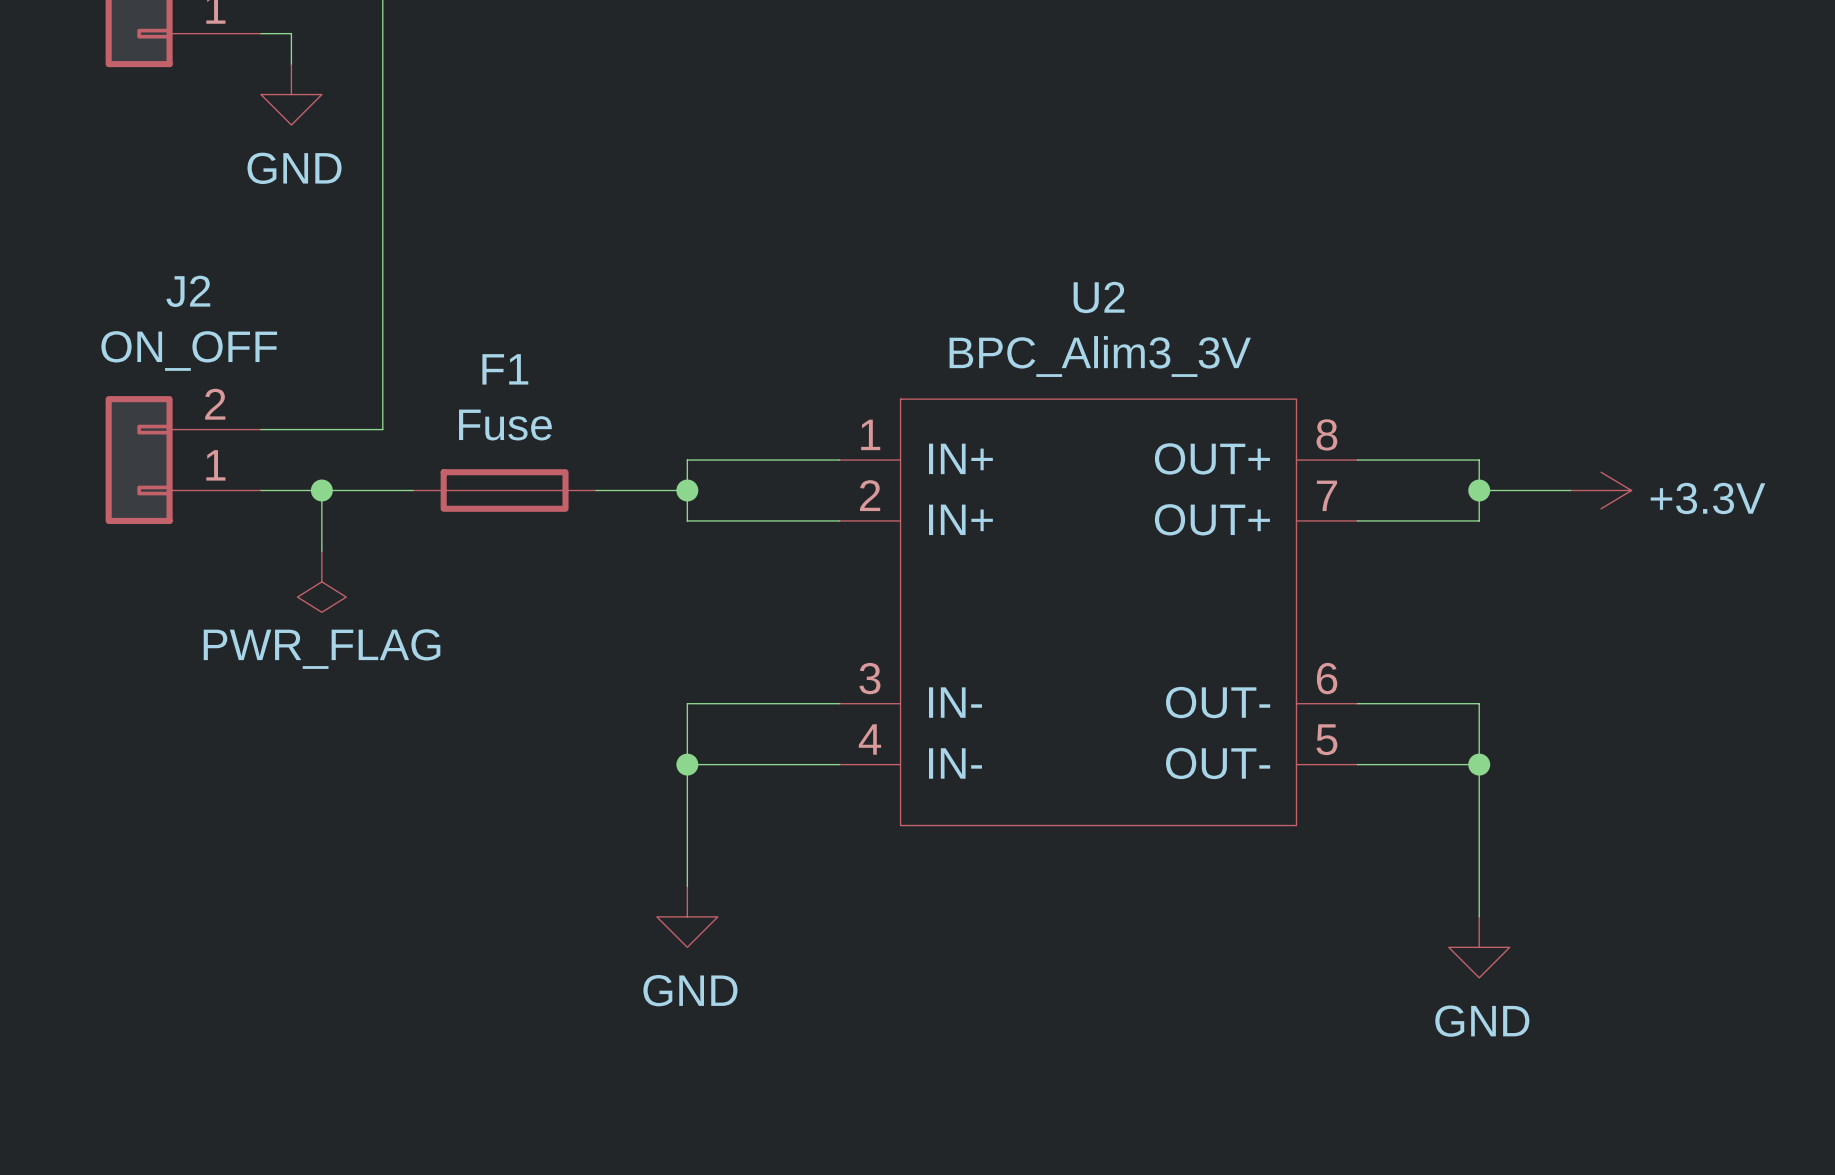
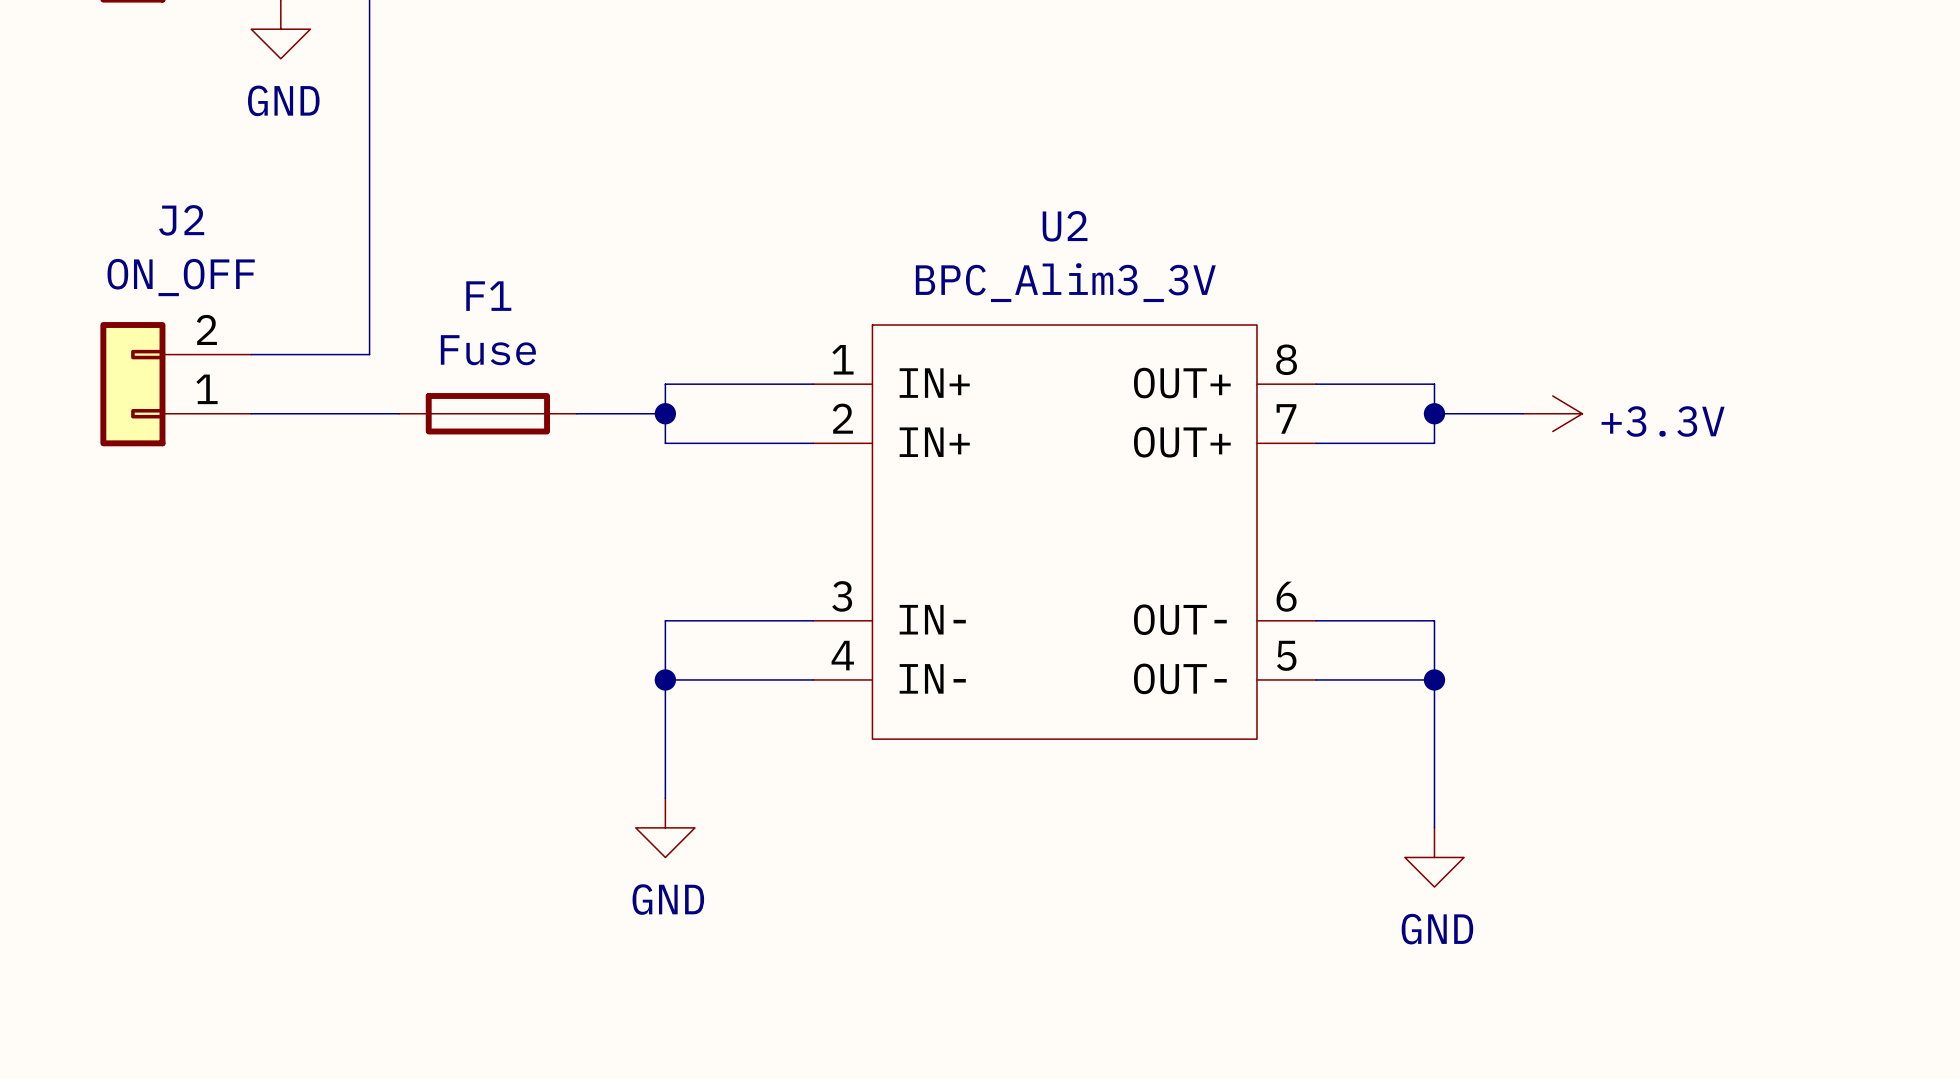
wire: (321, 490) (321, 551) -> none
junction: (321, 490) -> none
power symbol: PWR_FLAG (321, 581) -> none

